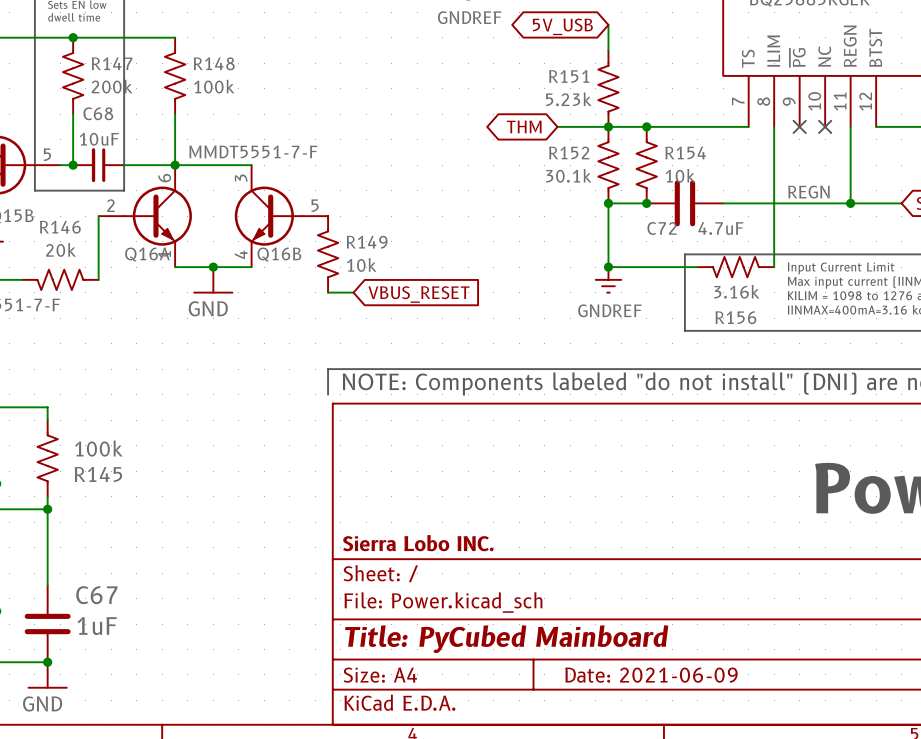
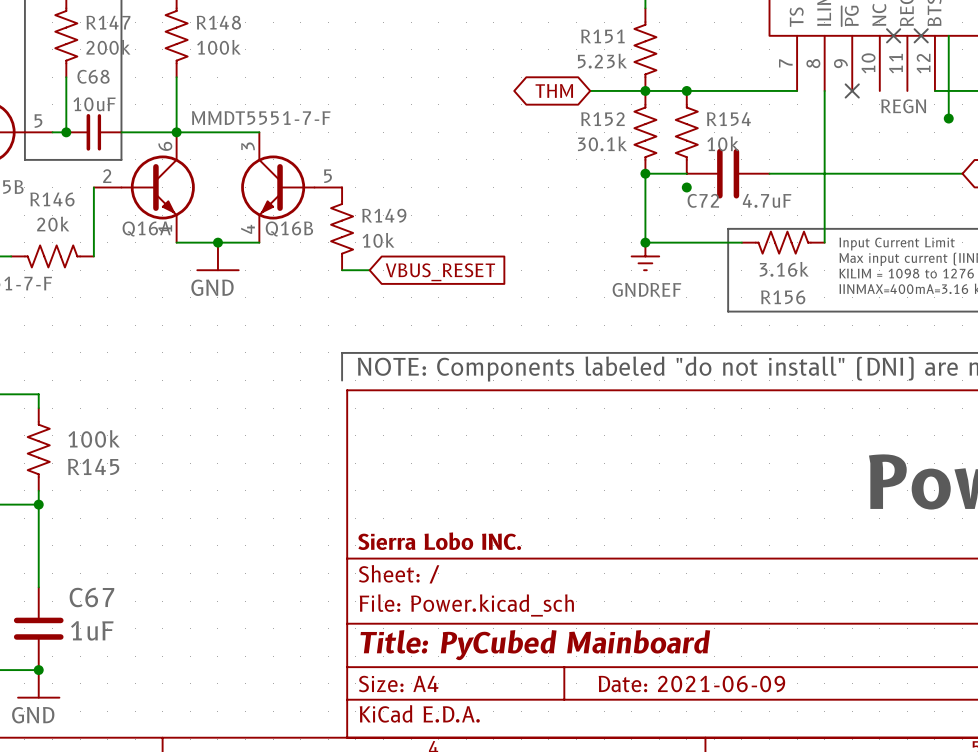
no-connect mark: none -> (893, 35)
no-connect mark: none -> (921, 35)
no-connect mark: (825, 126) -> none
wire: (850, 126) (850, 203) -> (948, 35) (948, 118)
junction: none -> (948, 118)
label position: REGN (808, 192) -> REGN (903, 106)
junction position: (646, 203) -> (686, 187)
junction: (850, 203) -> none

